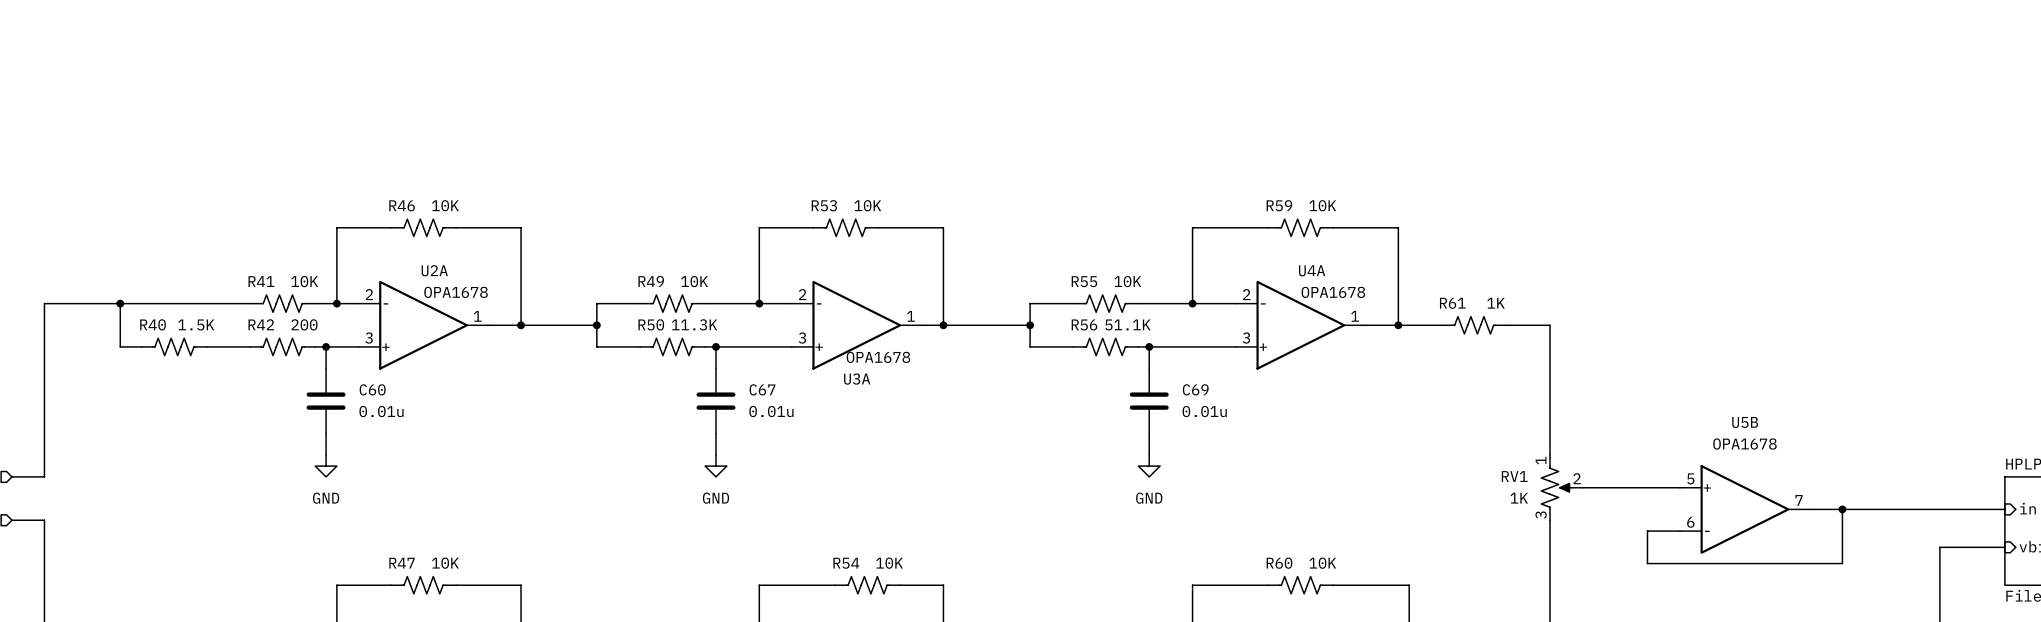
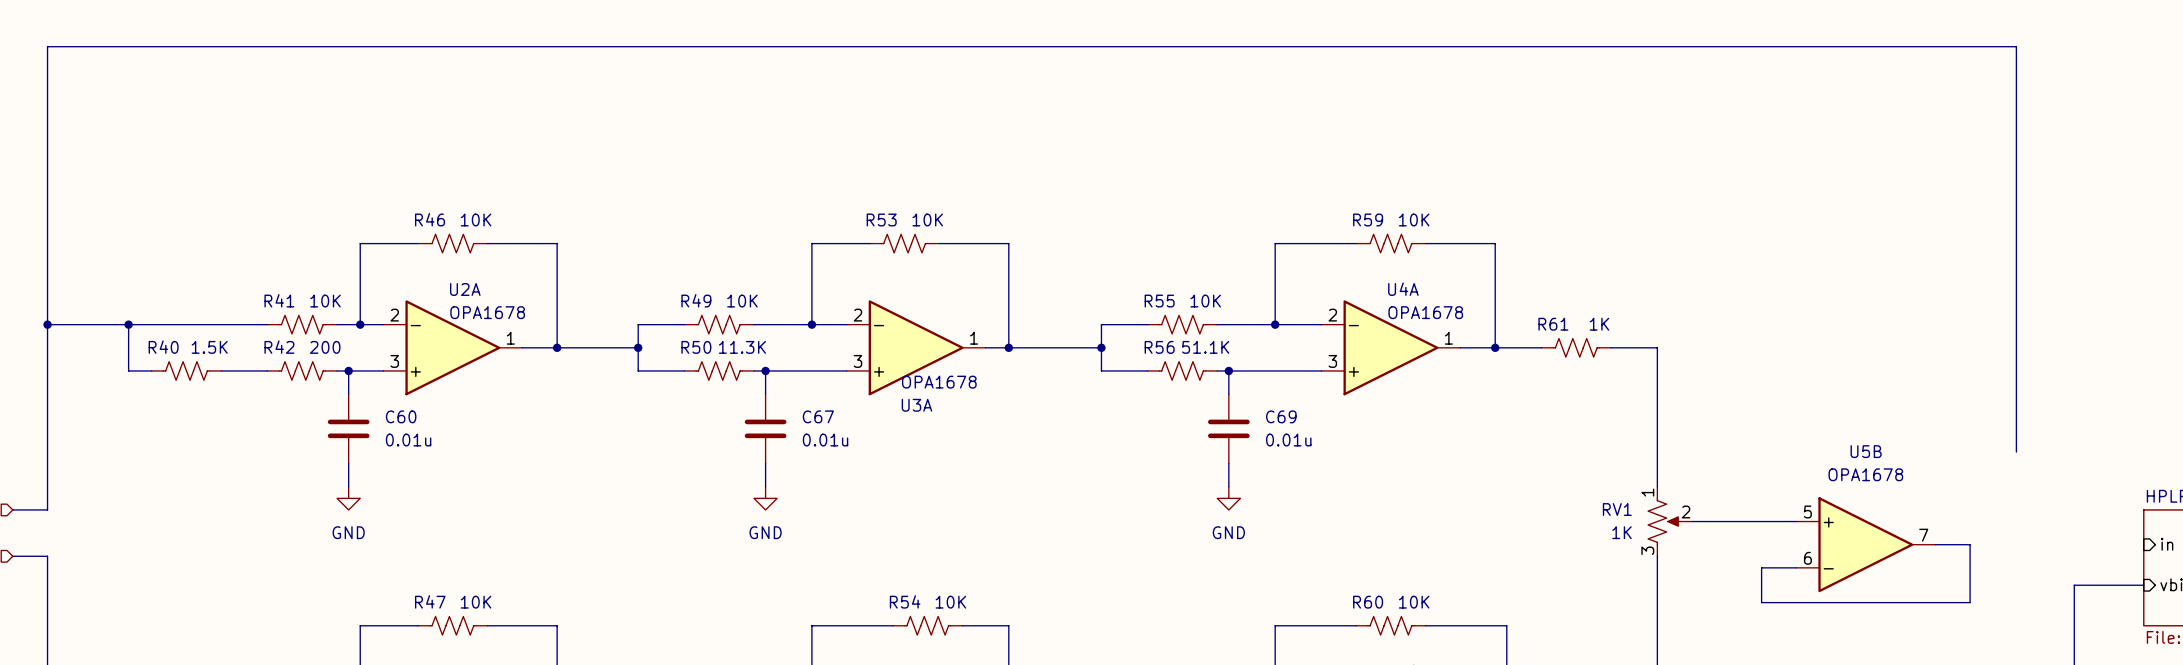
wire: none -> (47, 324) (47, 46) (2016, 46) (2016, 452)
junction: none -> (47, 324)
wire: (1842, 509) (2004, 509) -> none
junction: (1842, 509) -> none

